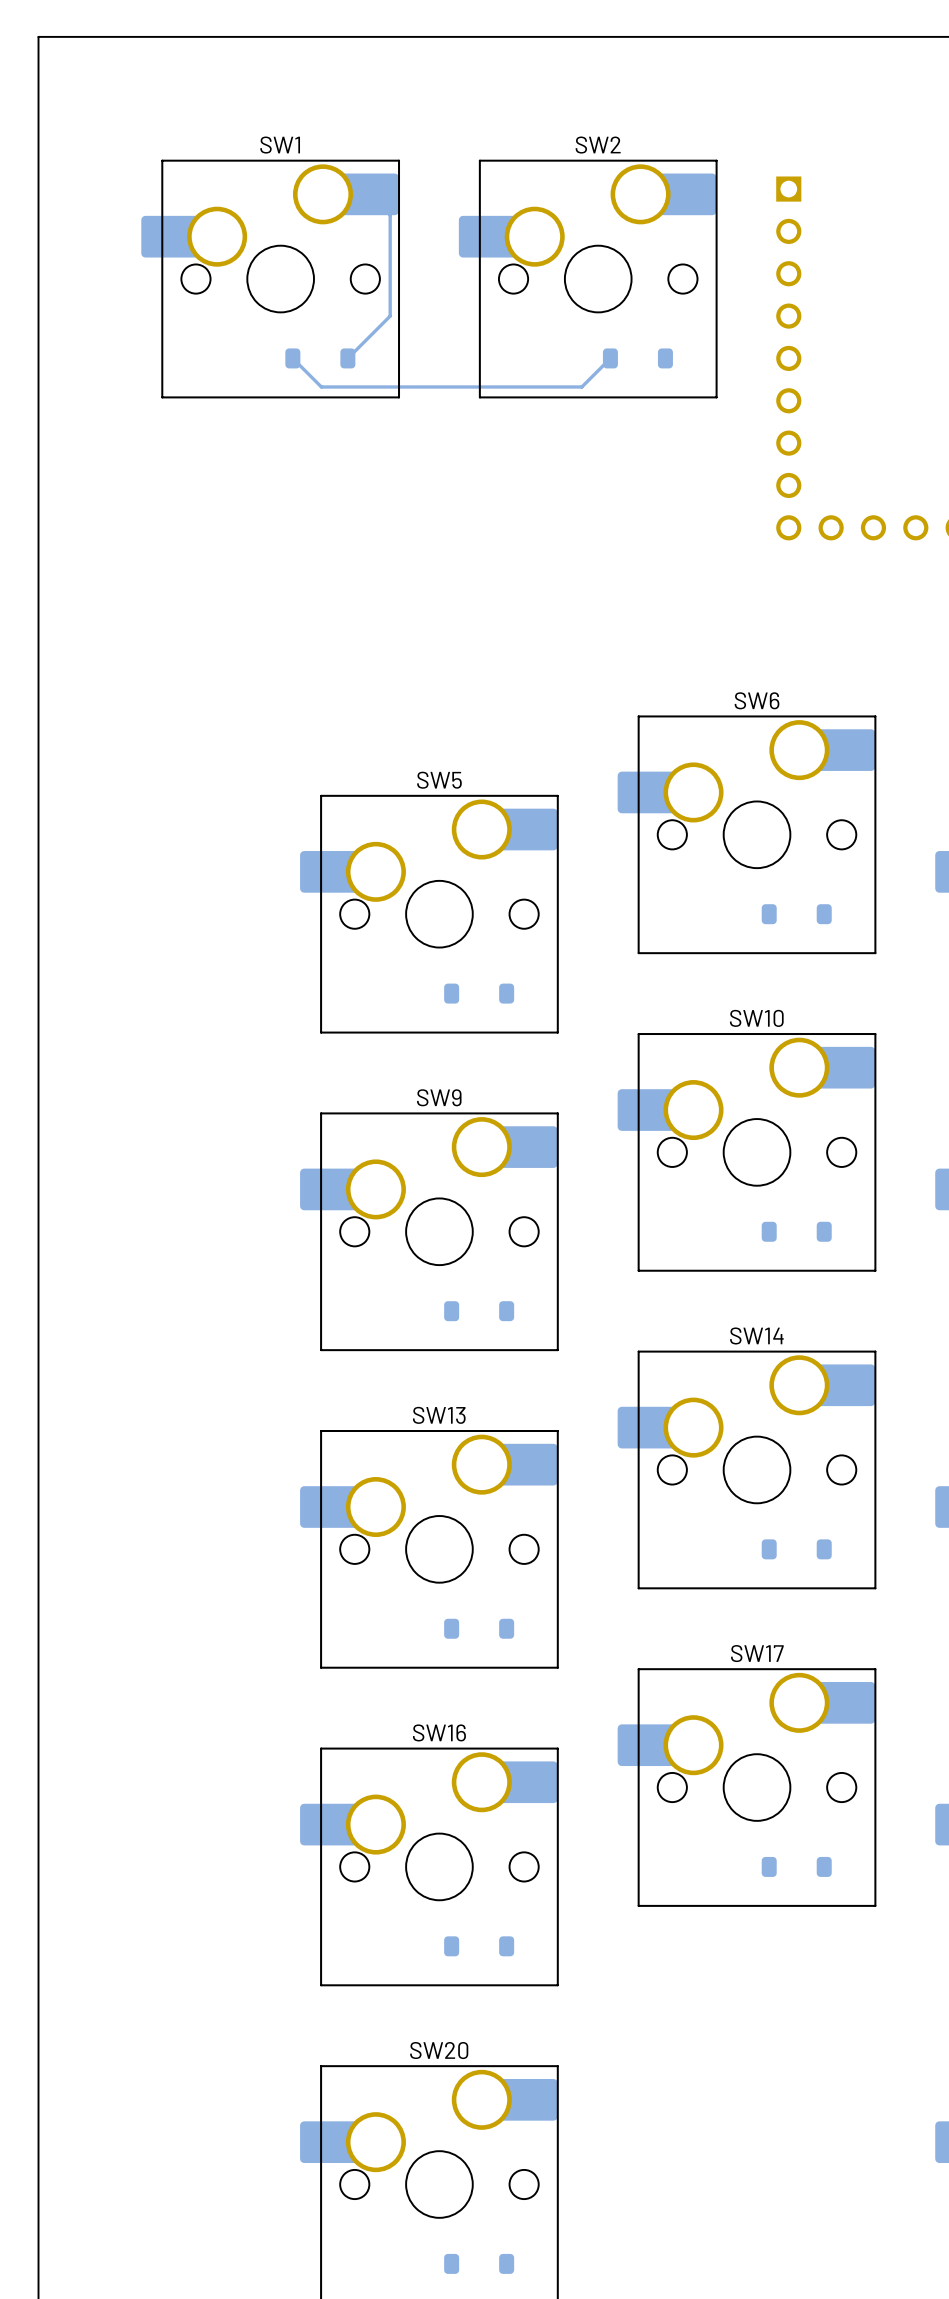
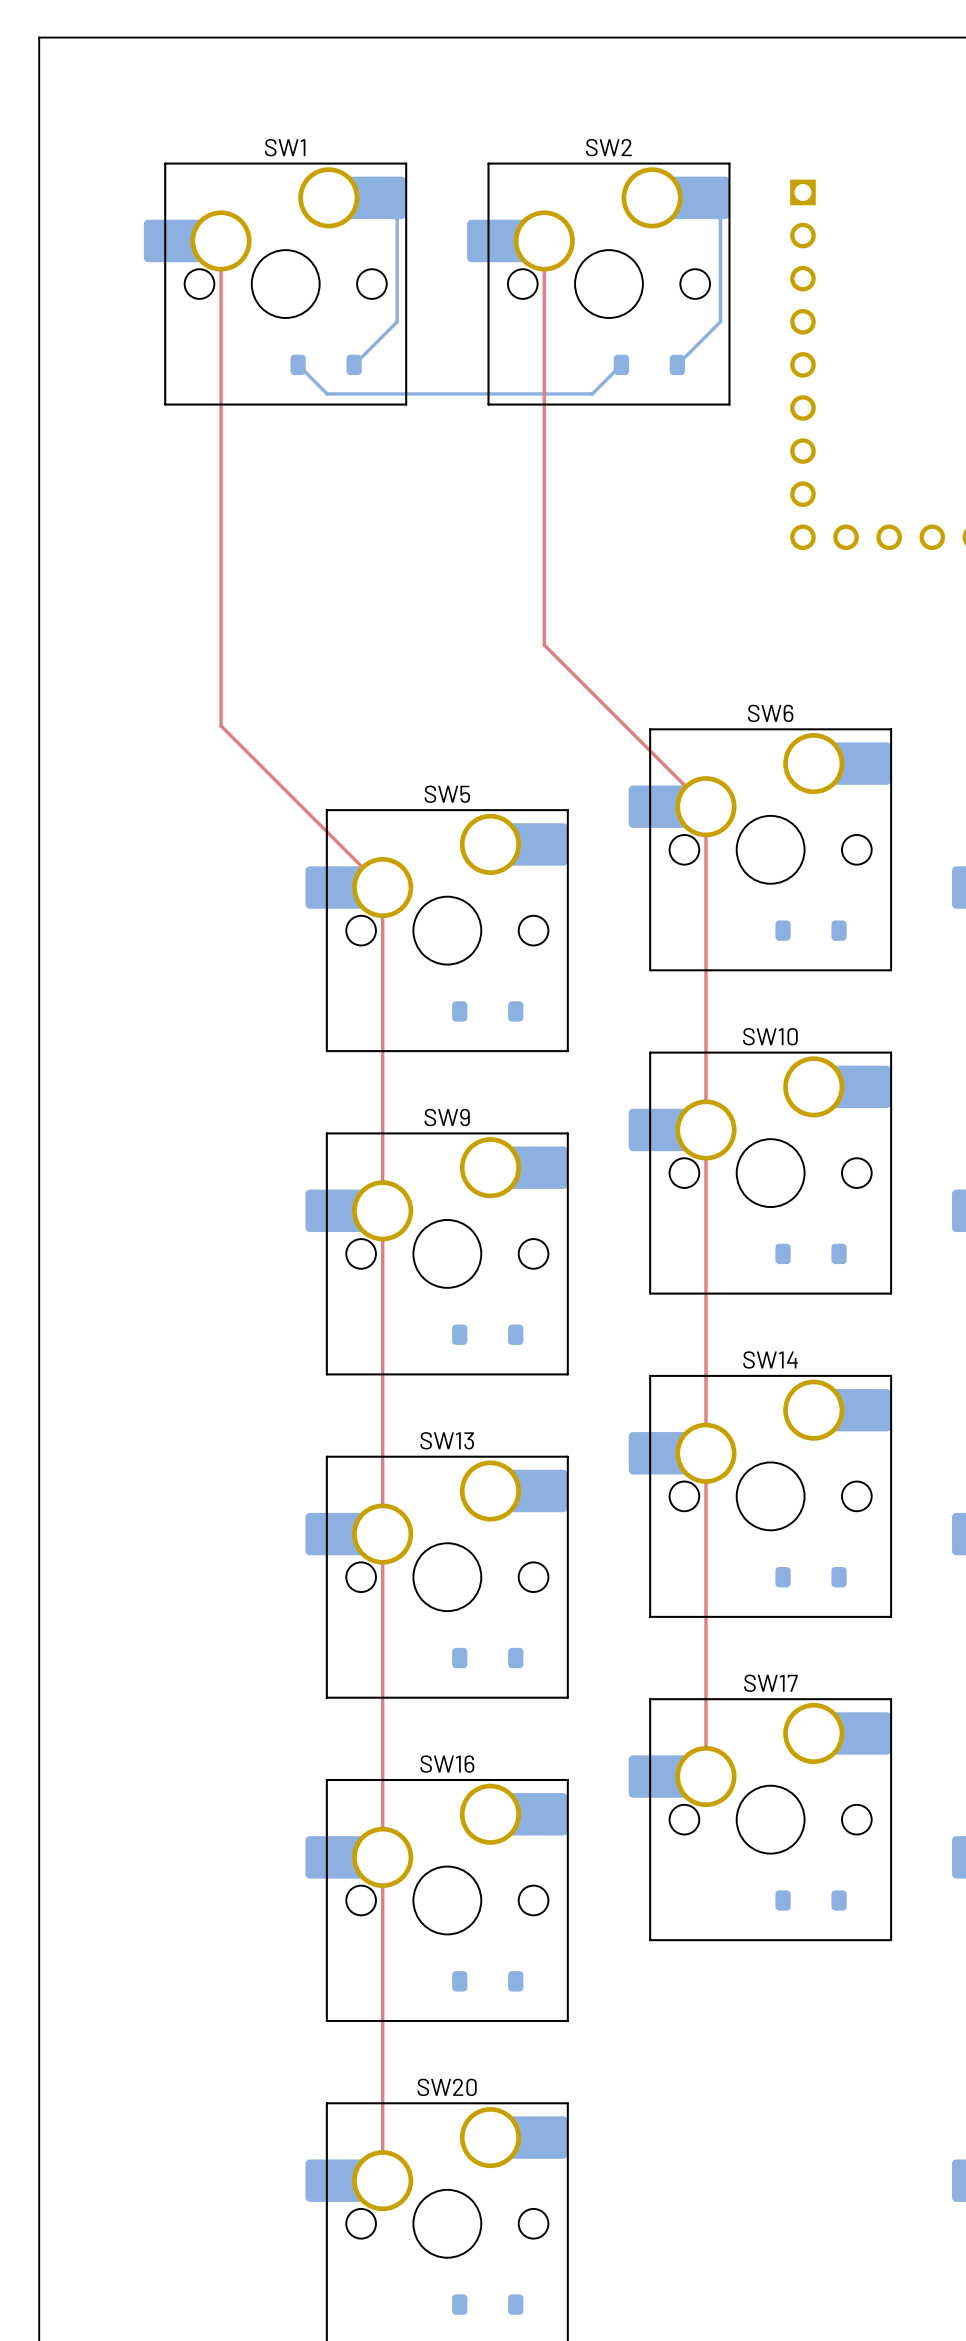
bottom track: none -> (699, 197) (720, 219) (720, 321) (677, 364)
top track: none -> (221, 240) (221, 725) (382, 887) (382, 2180)
top track: none -> (544, 240) (544, 645) (705, 806) (705, 1776)

